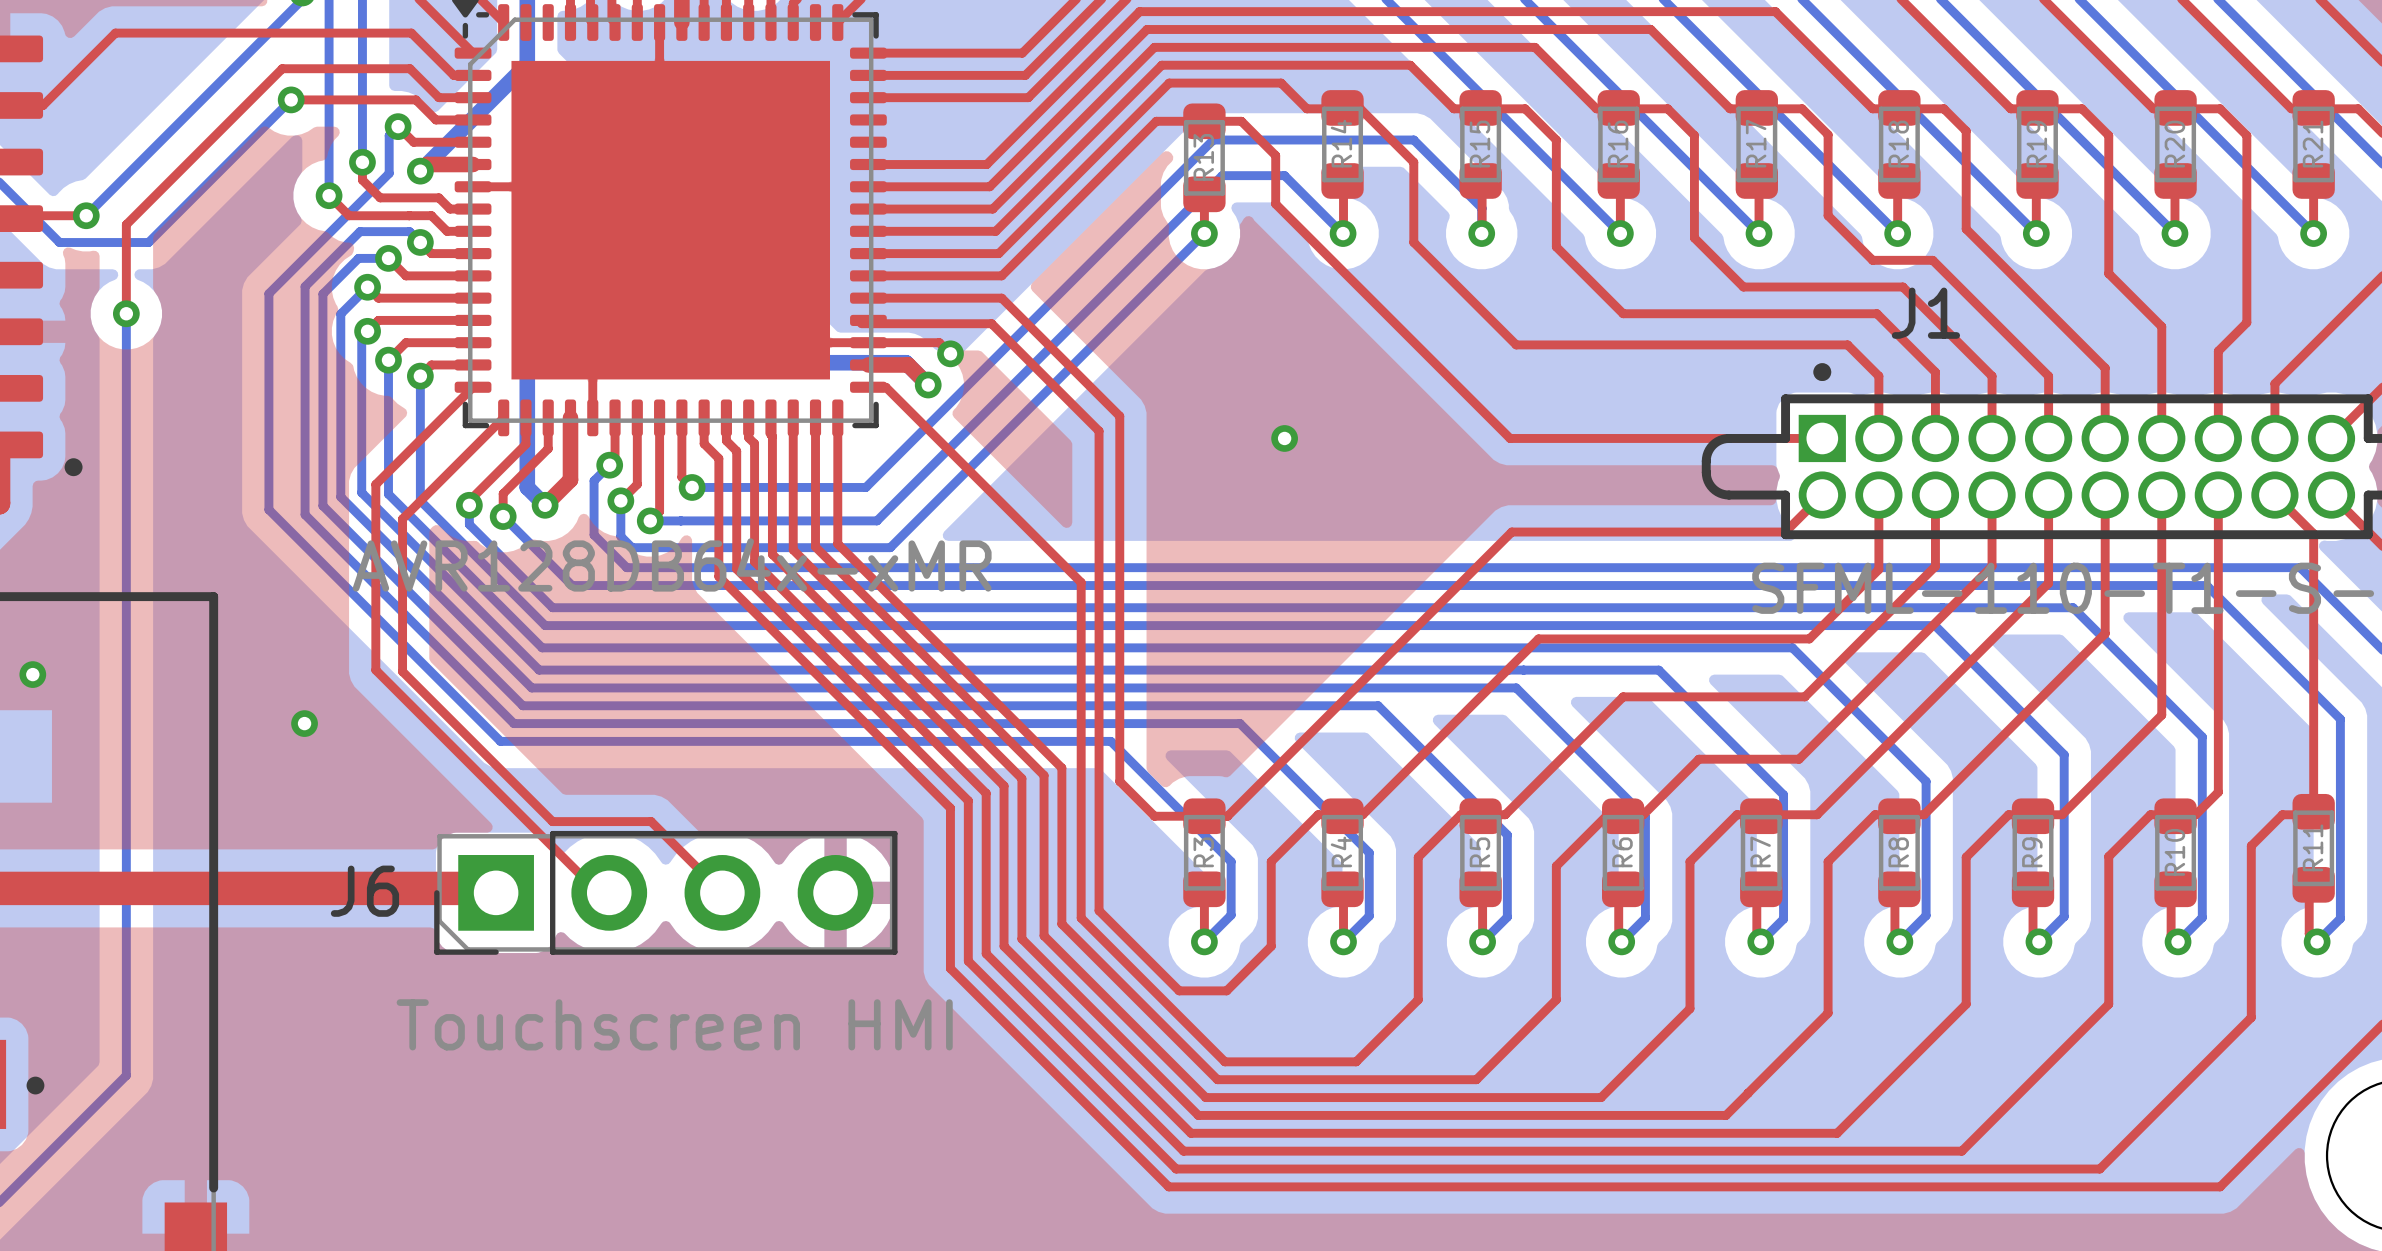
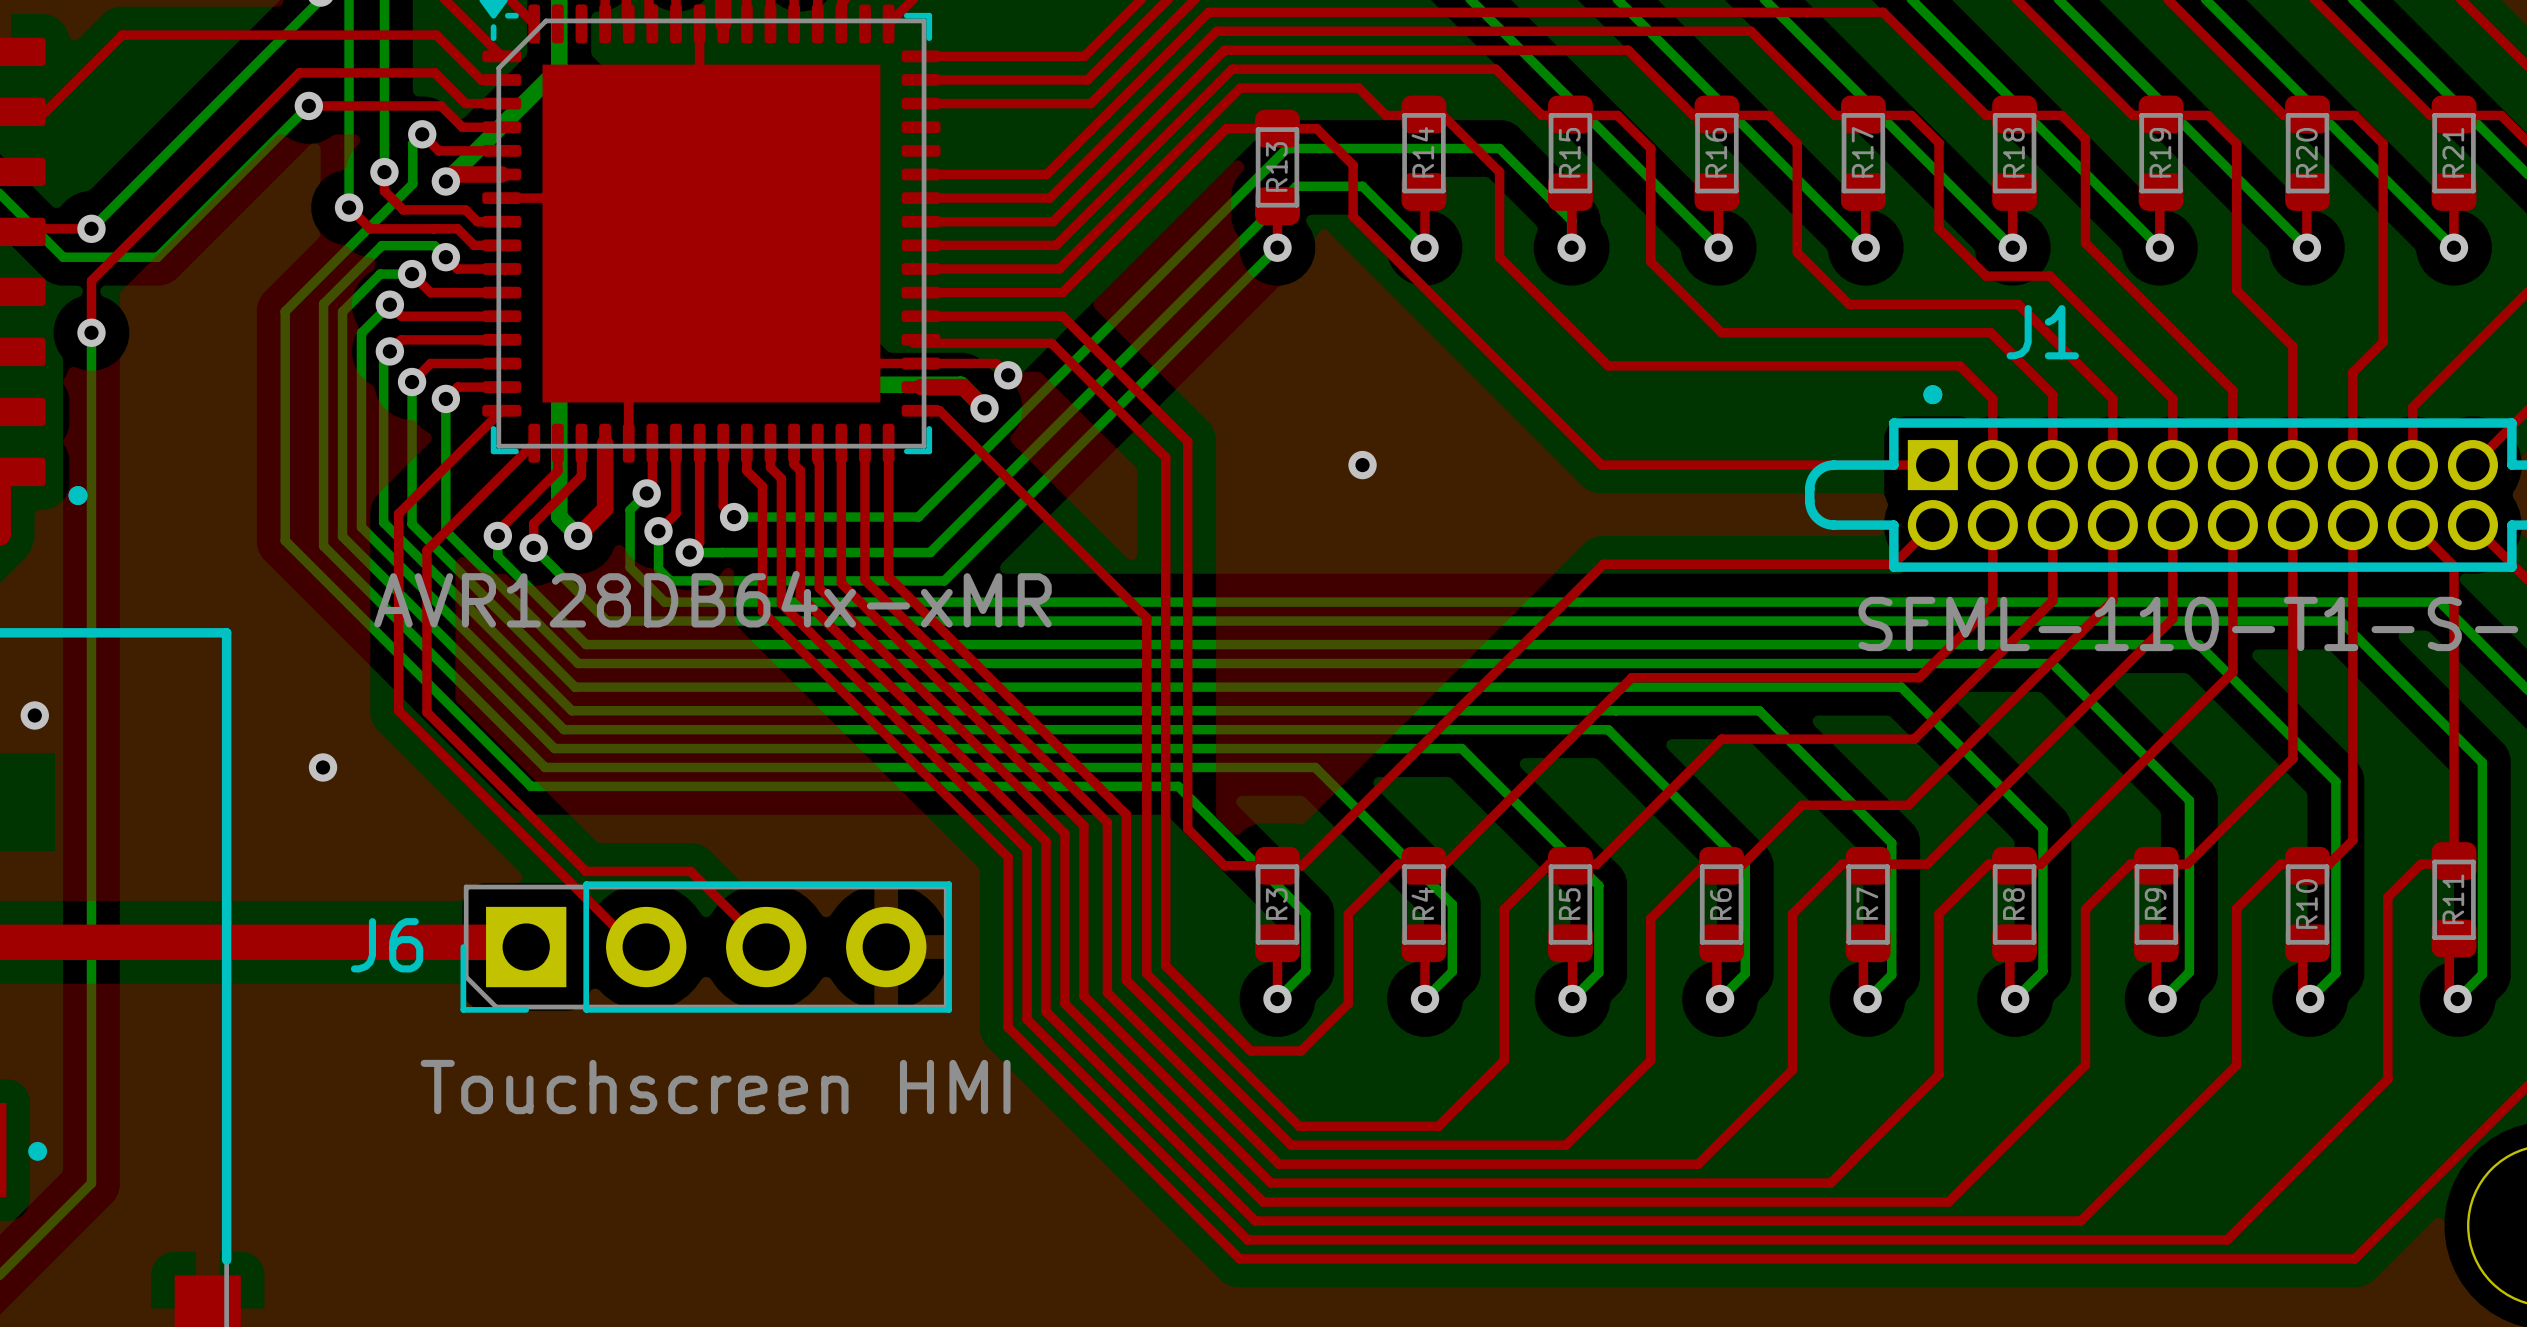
top track: (126, 224) (126, 313) -> (134, 238) (91, 280) (91, 332)
bottom track: (126, 313) (126, 1075) (86, 1115) -> (91, 332) (91, 1183)
via position: (126, 313) -> (91, 332)

